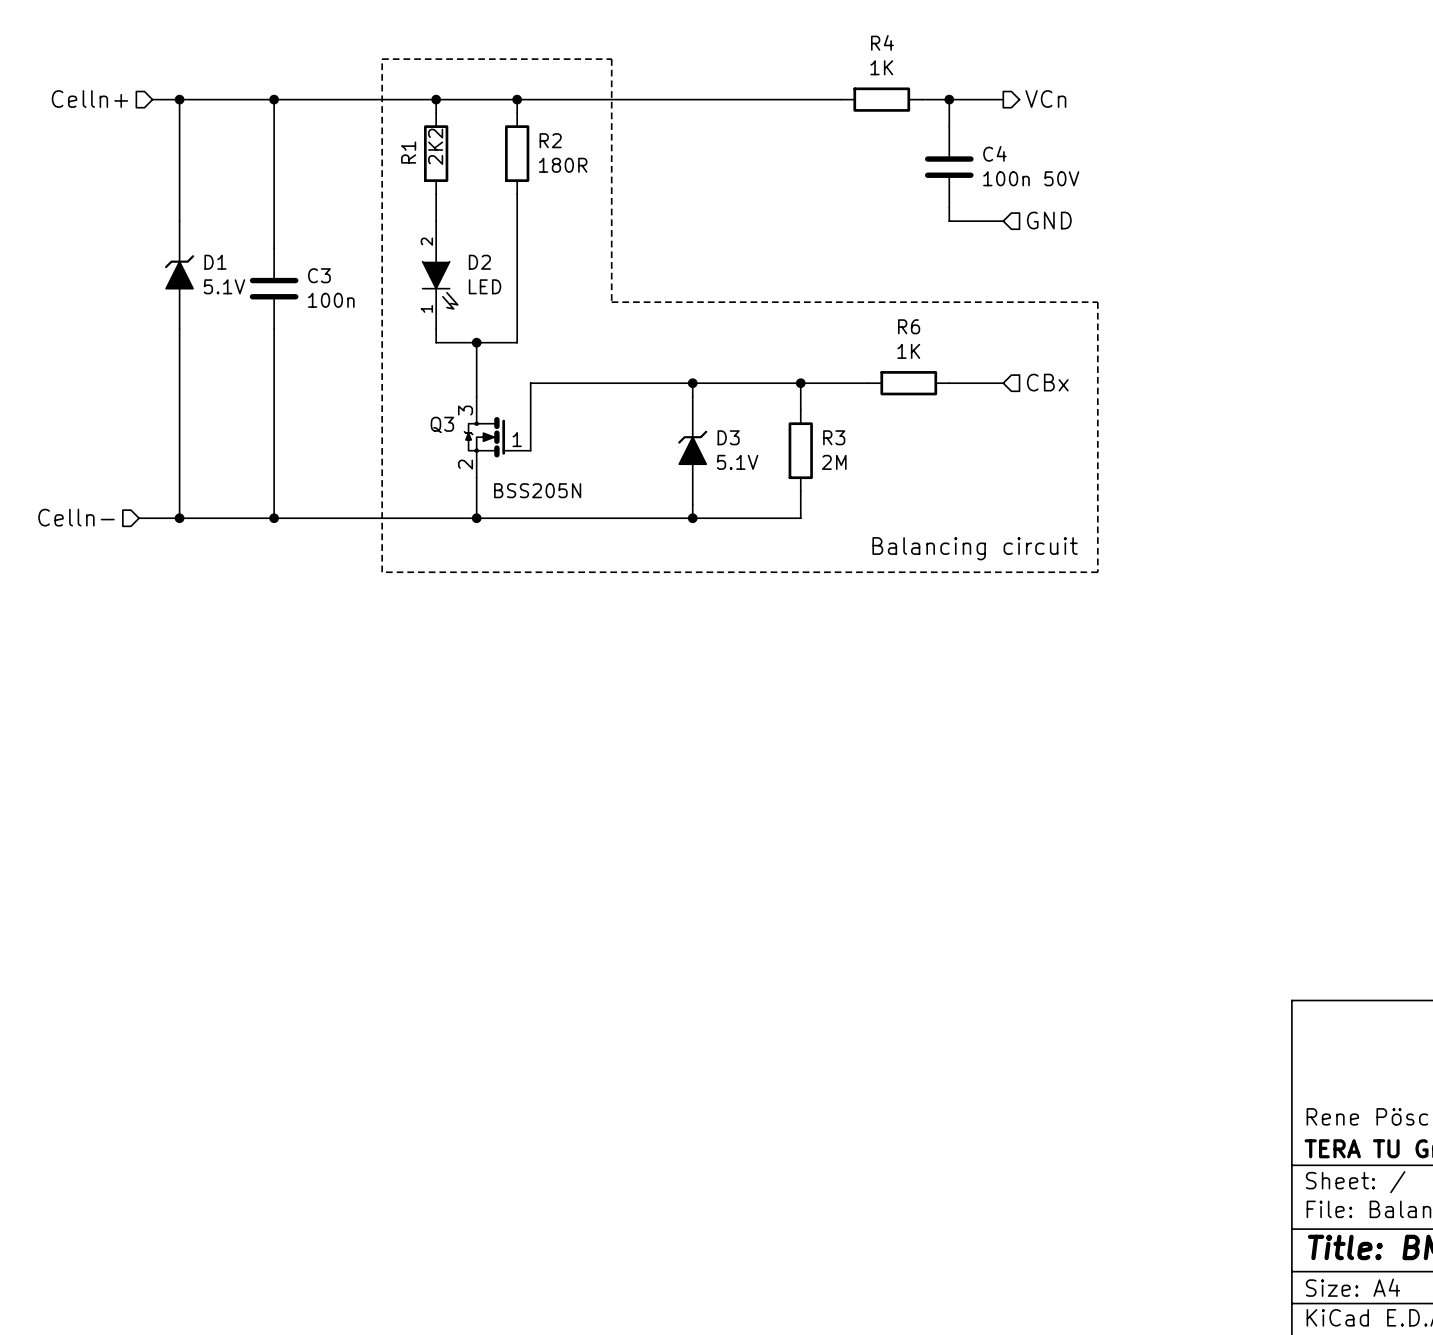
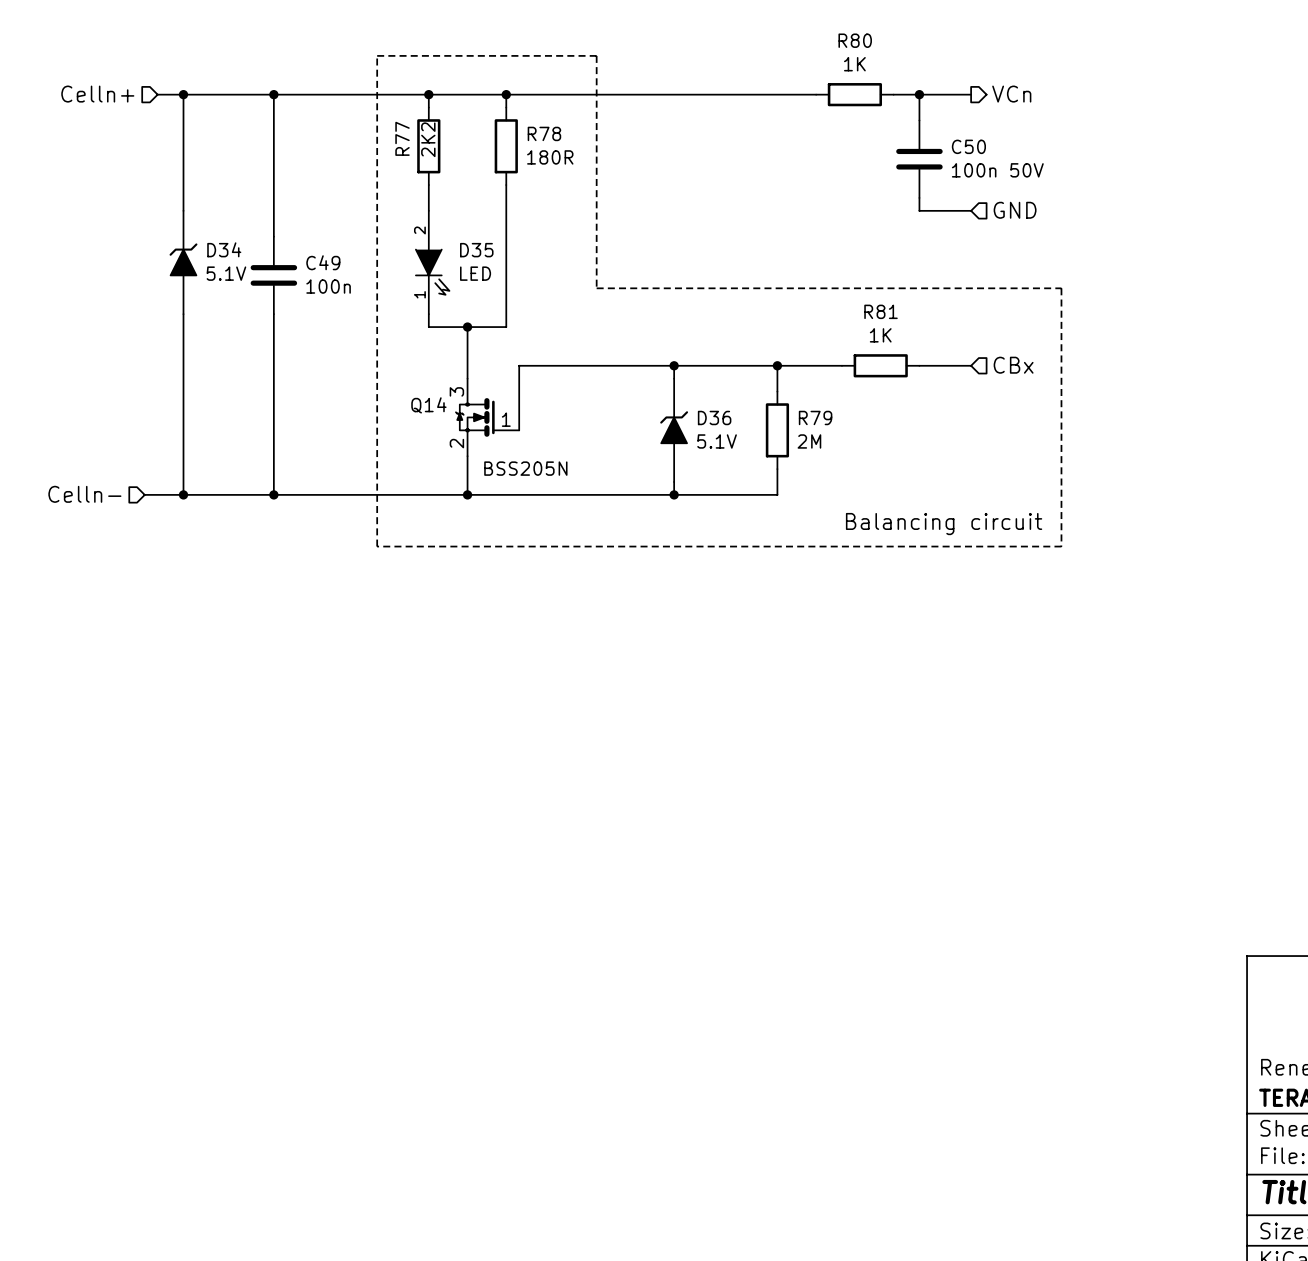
R4 name: R4 (882, 42) -> R80 (855, 40)
R2 name: R2 (550, 140) -> R78 (544, 133)
R1 name: R1 (408, 152) -> R77 (402, 138)
C4 name: C4 (994, 153) -> C50 (968, 146)
D1 name: D1 (215, 262) -> D34 (224, 249)
D2 name: D2 (479, 262) -> D35 (476, 250)
C3 name: C3 (319, 275) -> C49 (323, 262)
R6 name: R6 (909, 326) -> R81 (881, 311)
Q3 name: Q3 (442, 424) -> Q14 (428, 405)
D3 name: D3 (728, 437) -> D36 (714, 417)
R3 name: R3 (834, 437) -> R79 (815, 417)

